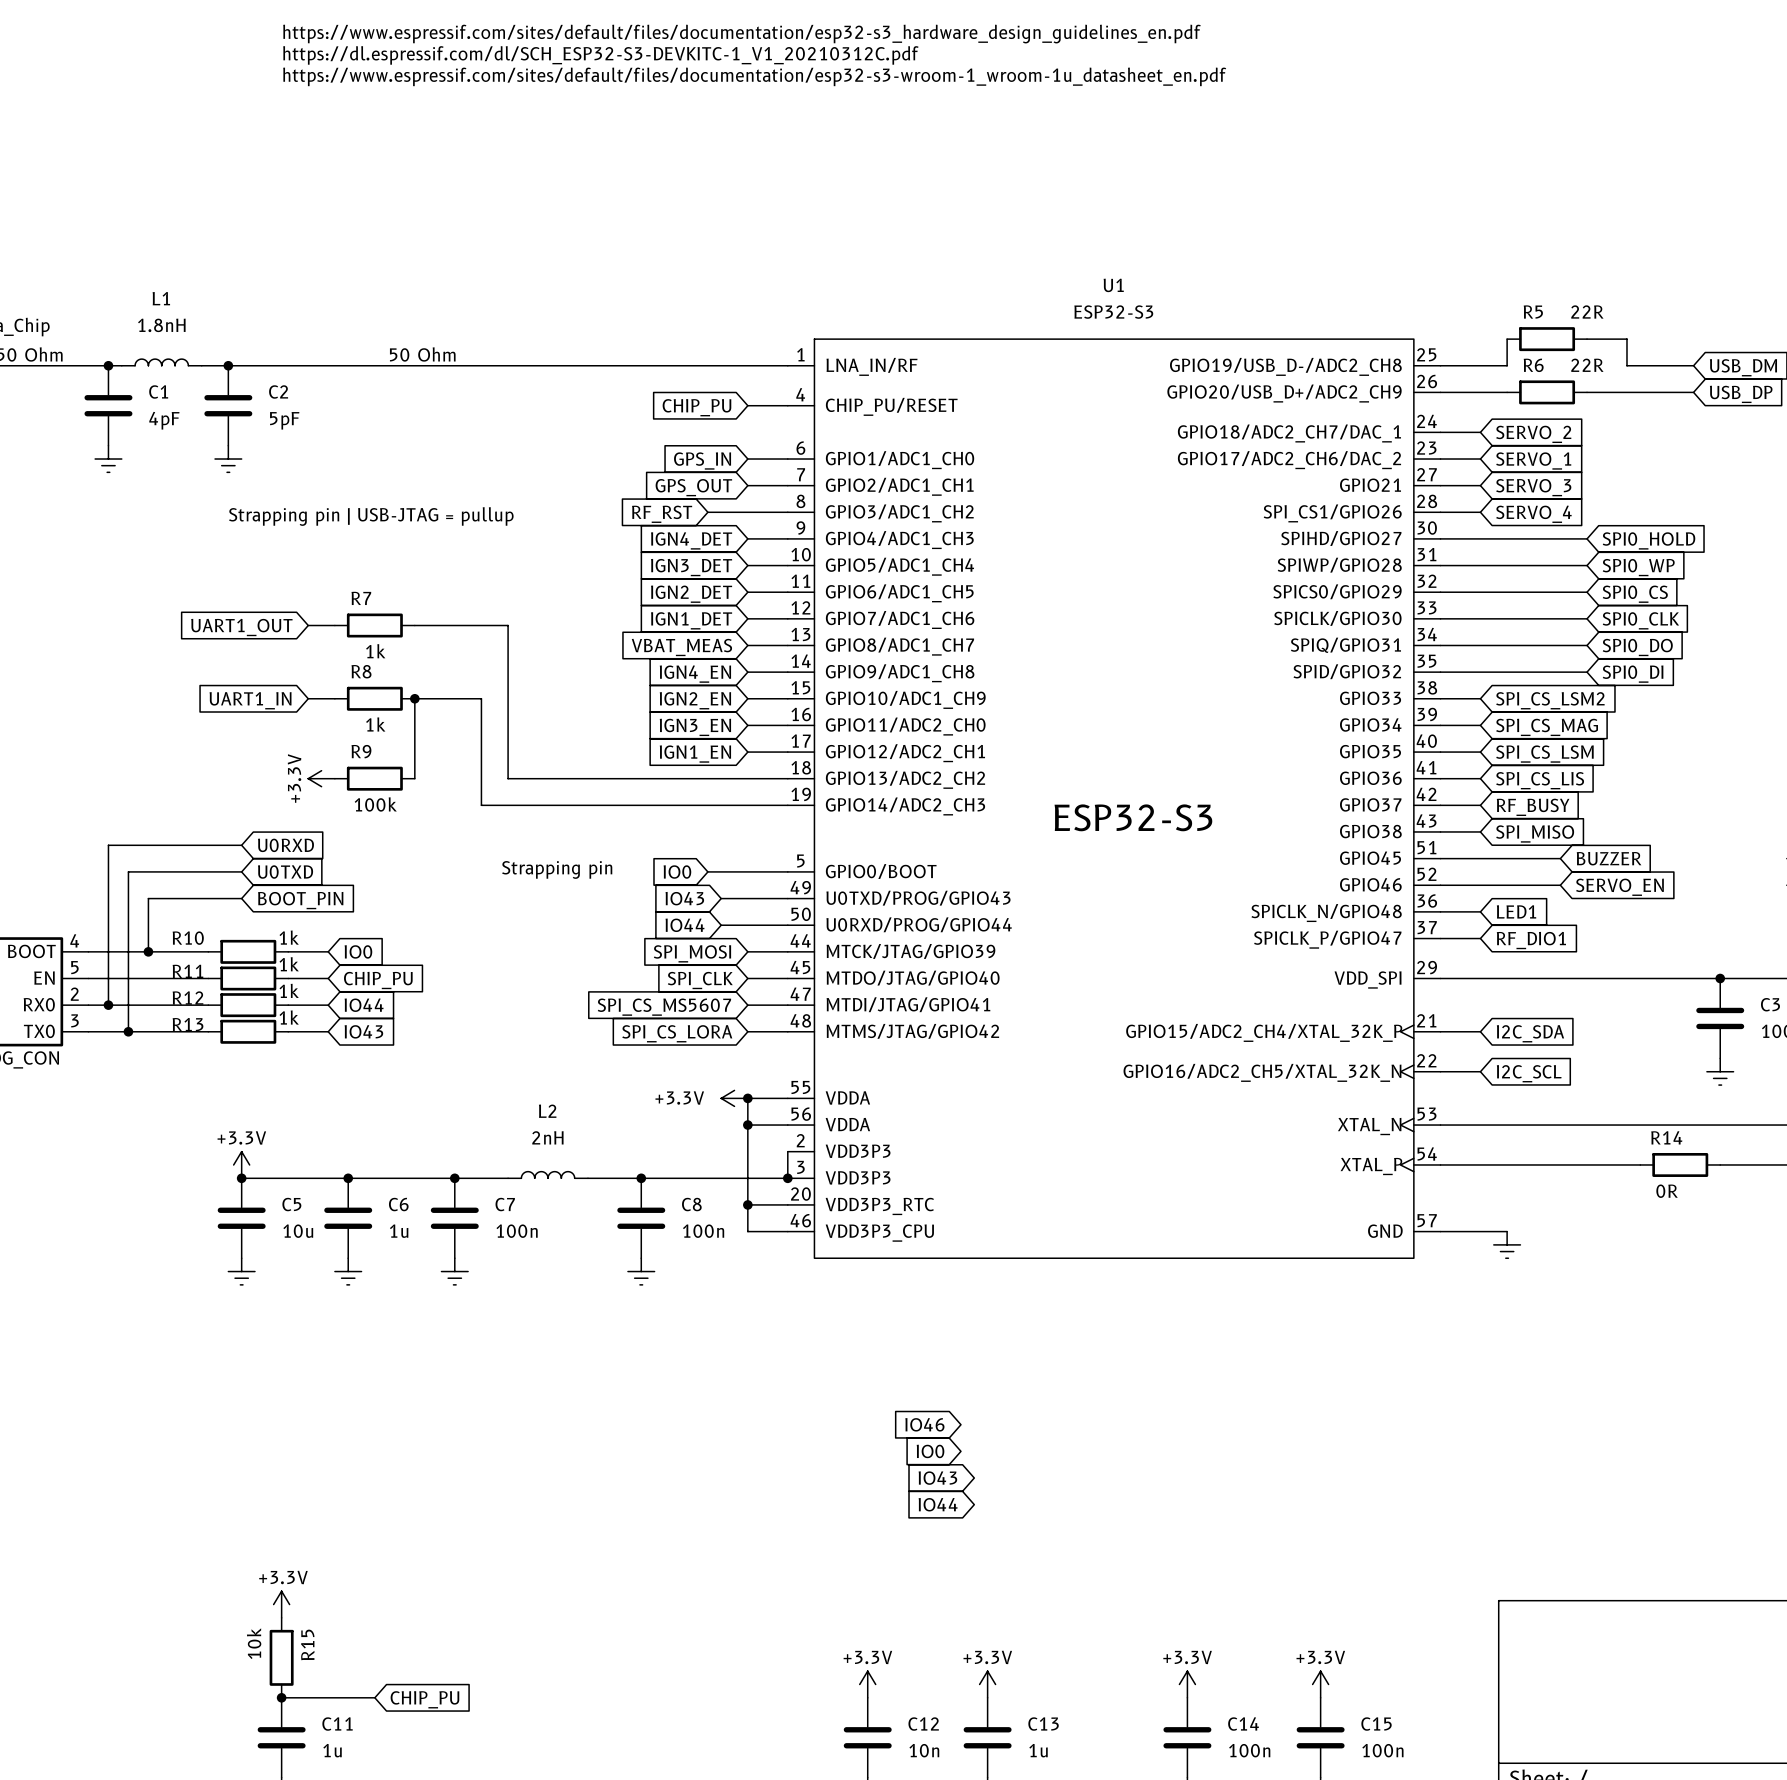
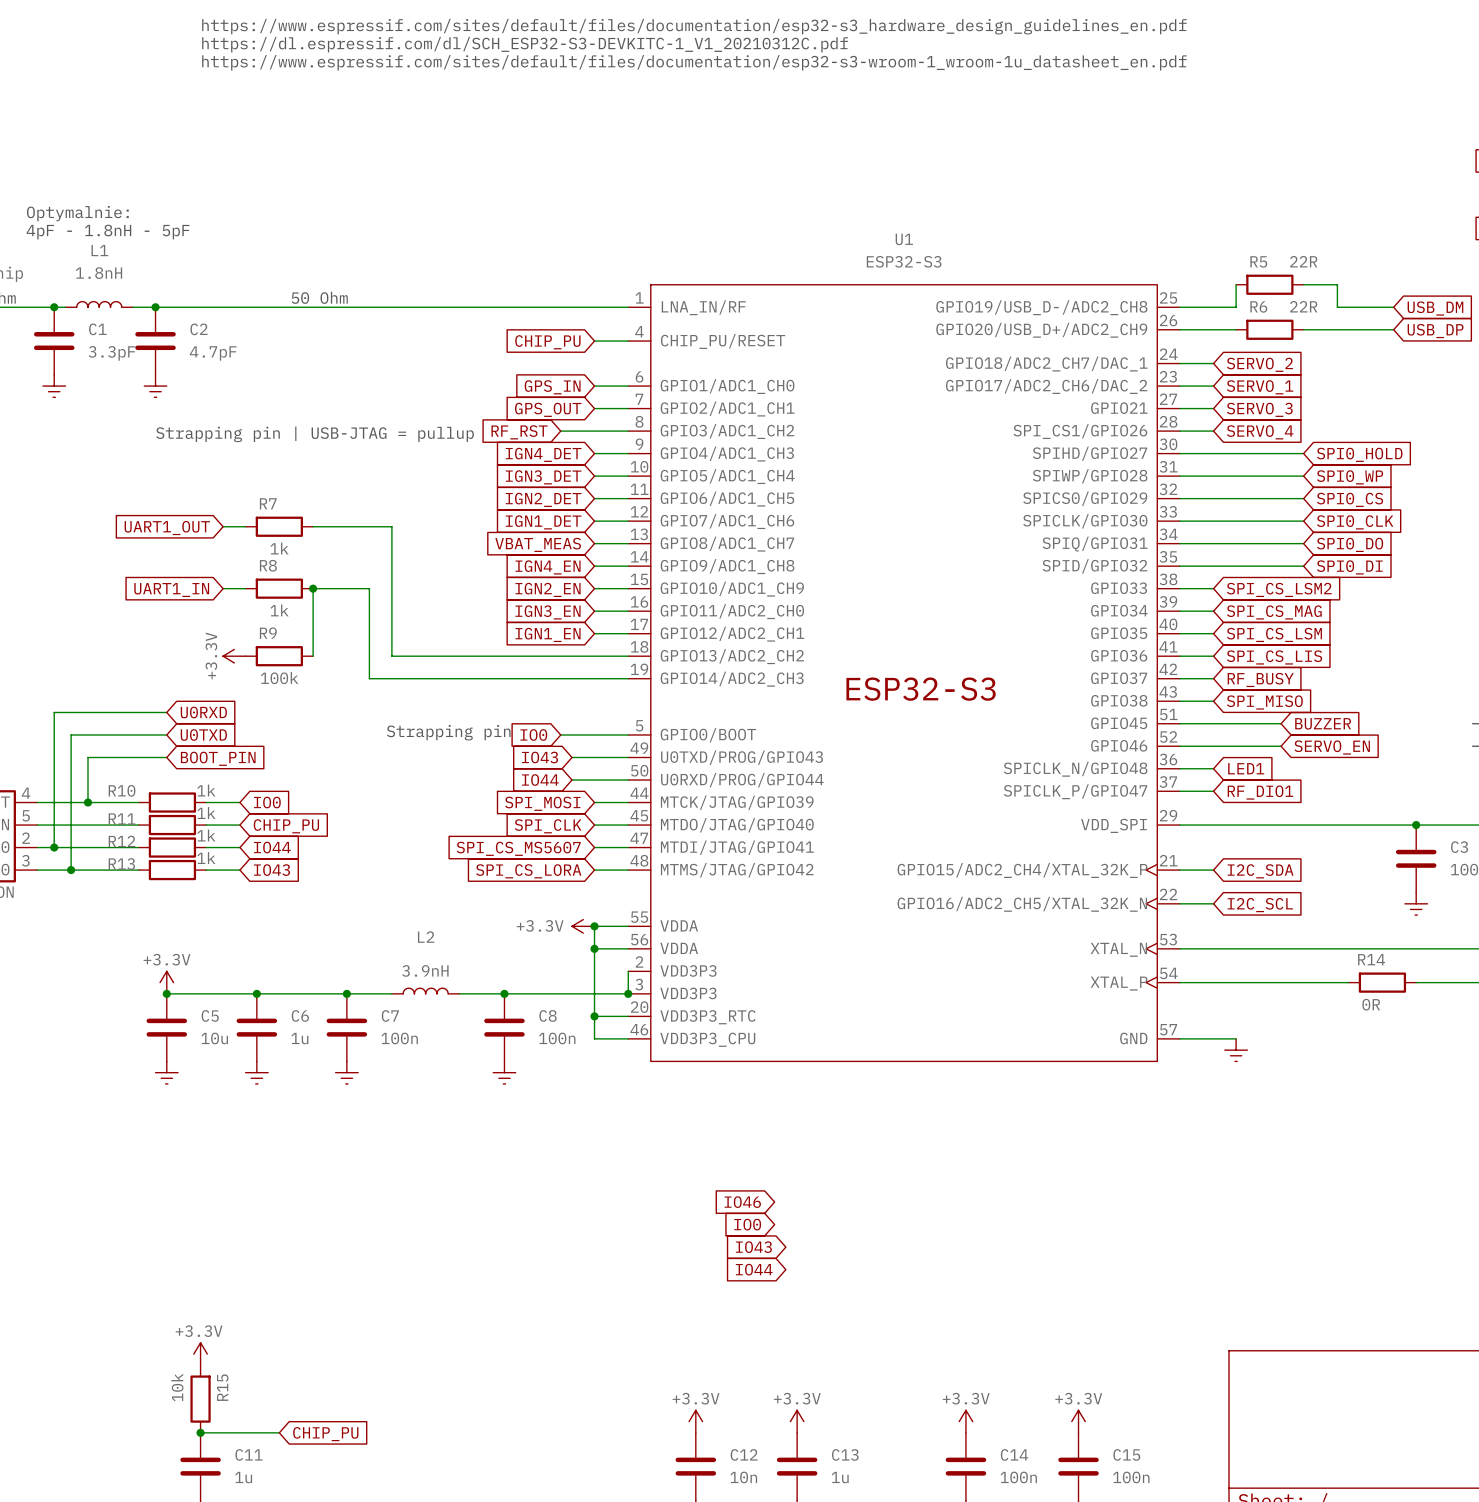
text: none -> Optymalnie: (77, 213)
text: none -> 4pF - 1.8nH - 5pF (108, 232)
C1 value: 4pF (164, 420) -> 3.3pF (112, 353)
C2 value: 5pF (284, 420) -> 4.7pF (213, 353)
L2 value: 2nH (547, 1137) -> 3.9nH (425, 970)

